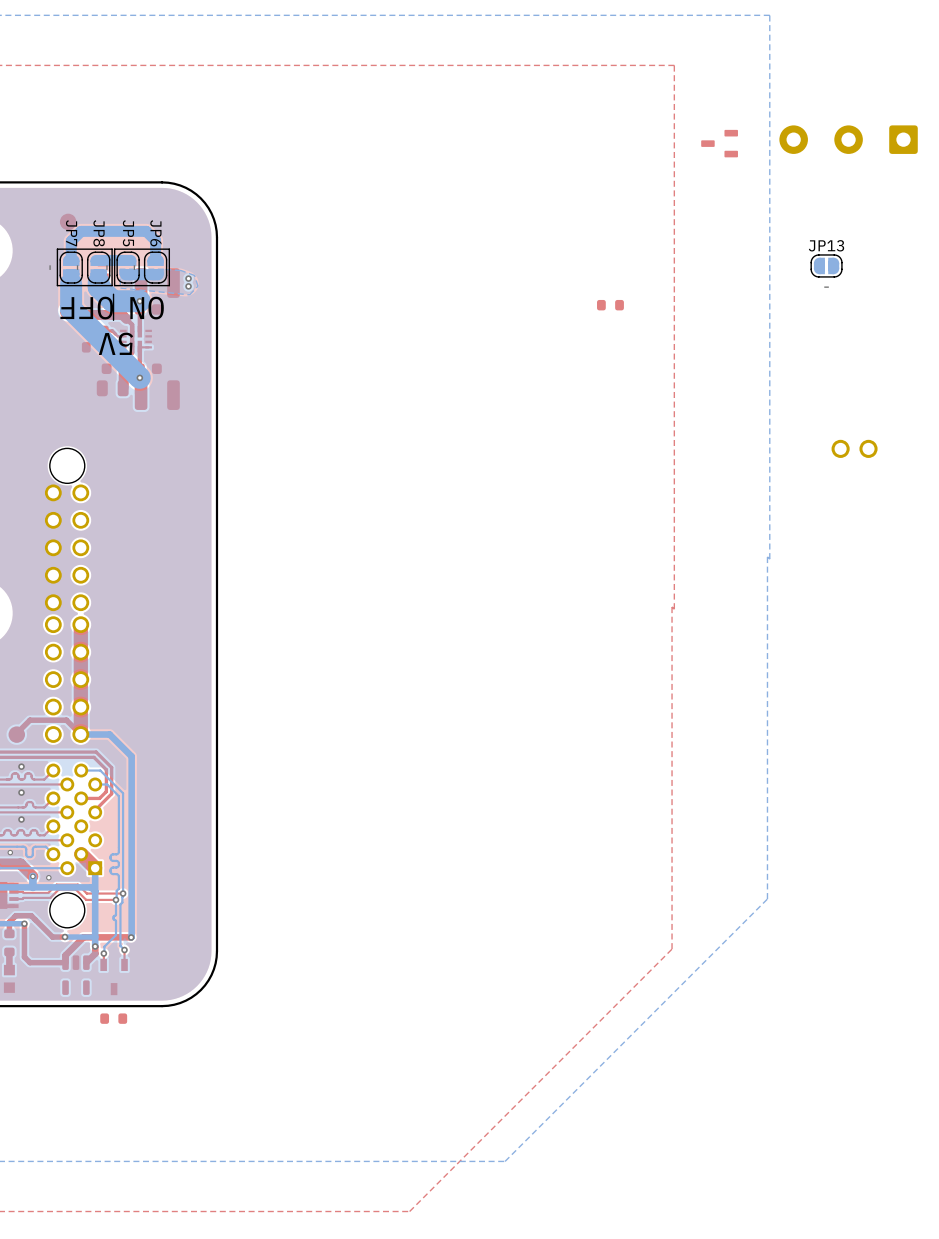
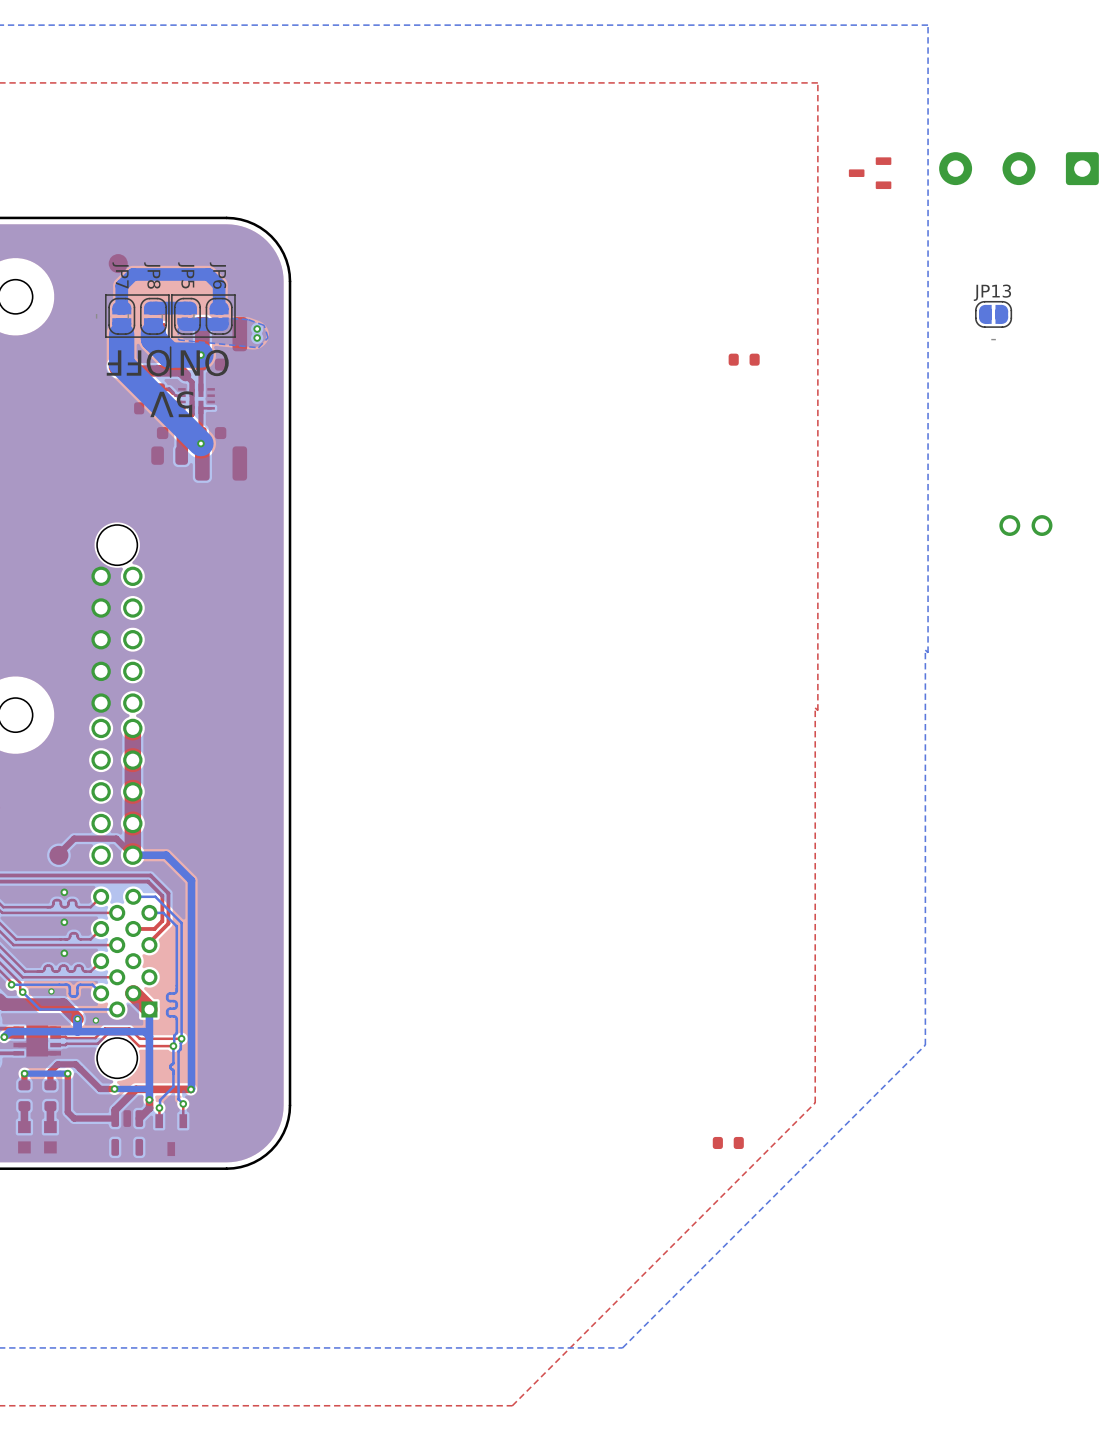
part: none -> (728, 1142)
part: (113, 1018) -> none

